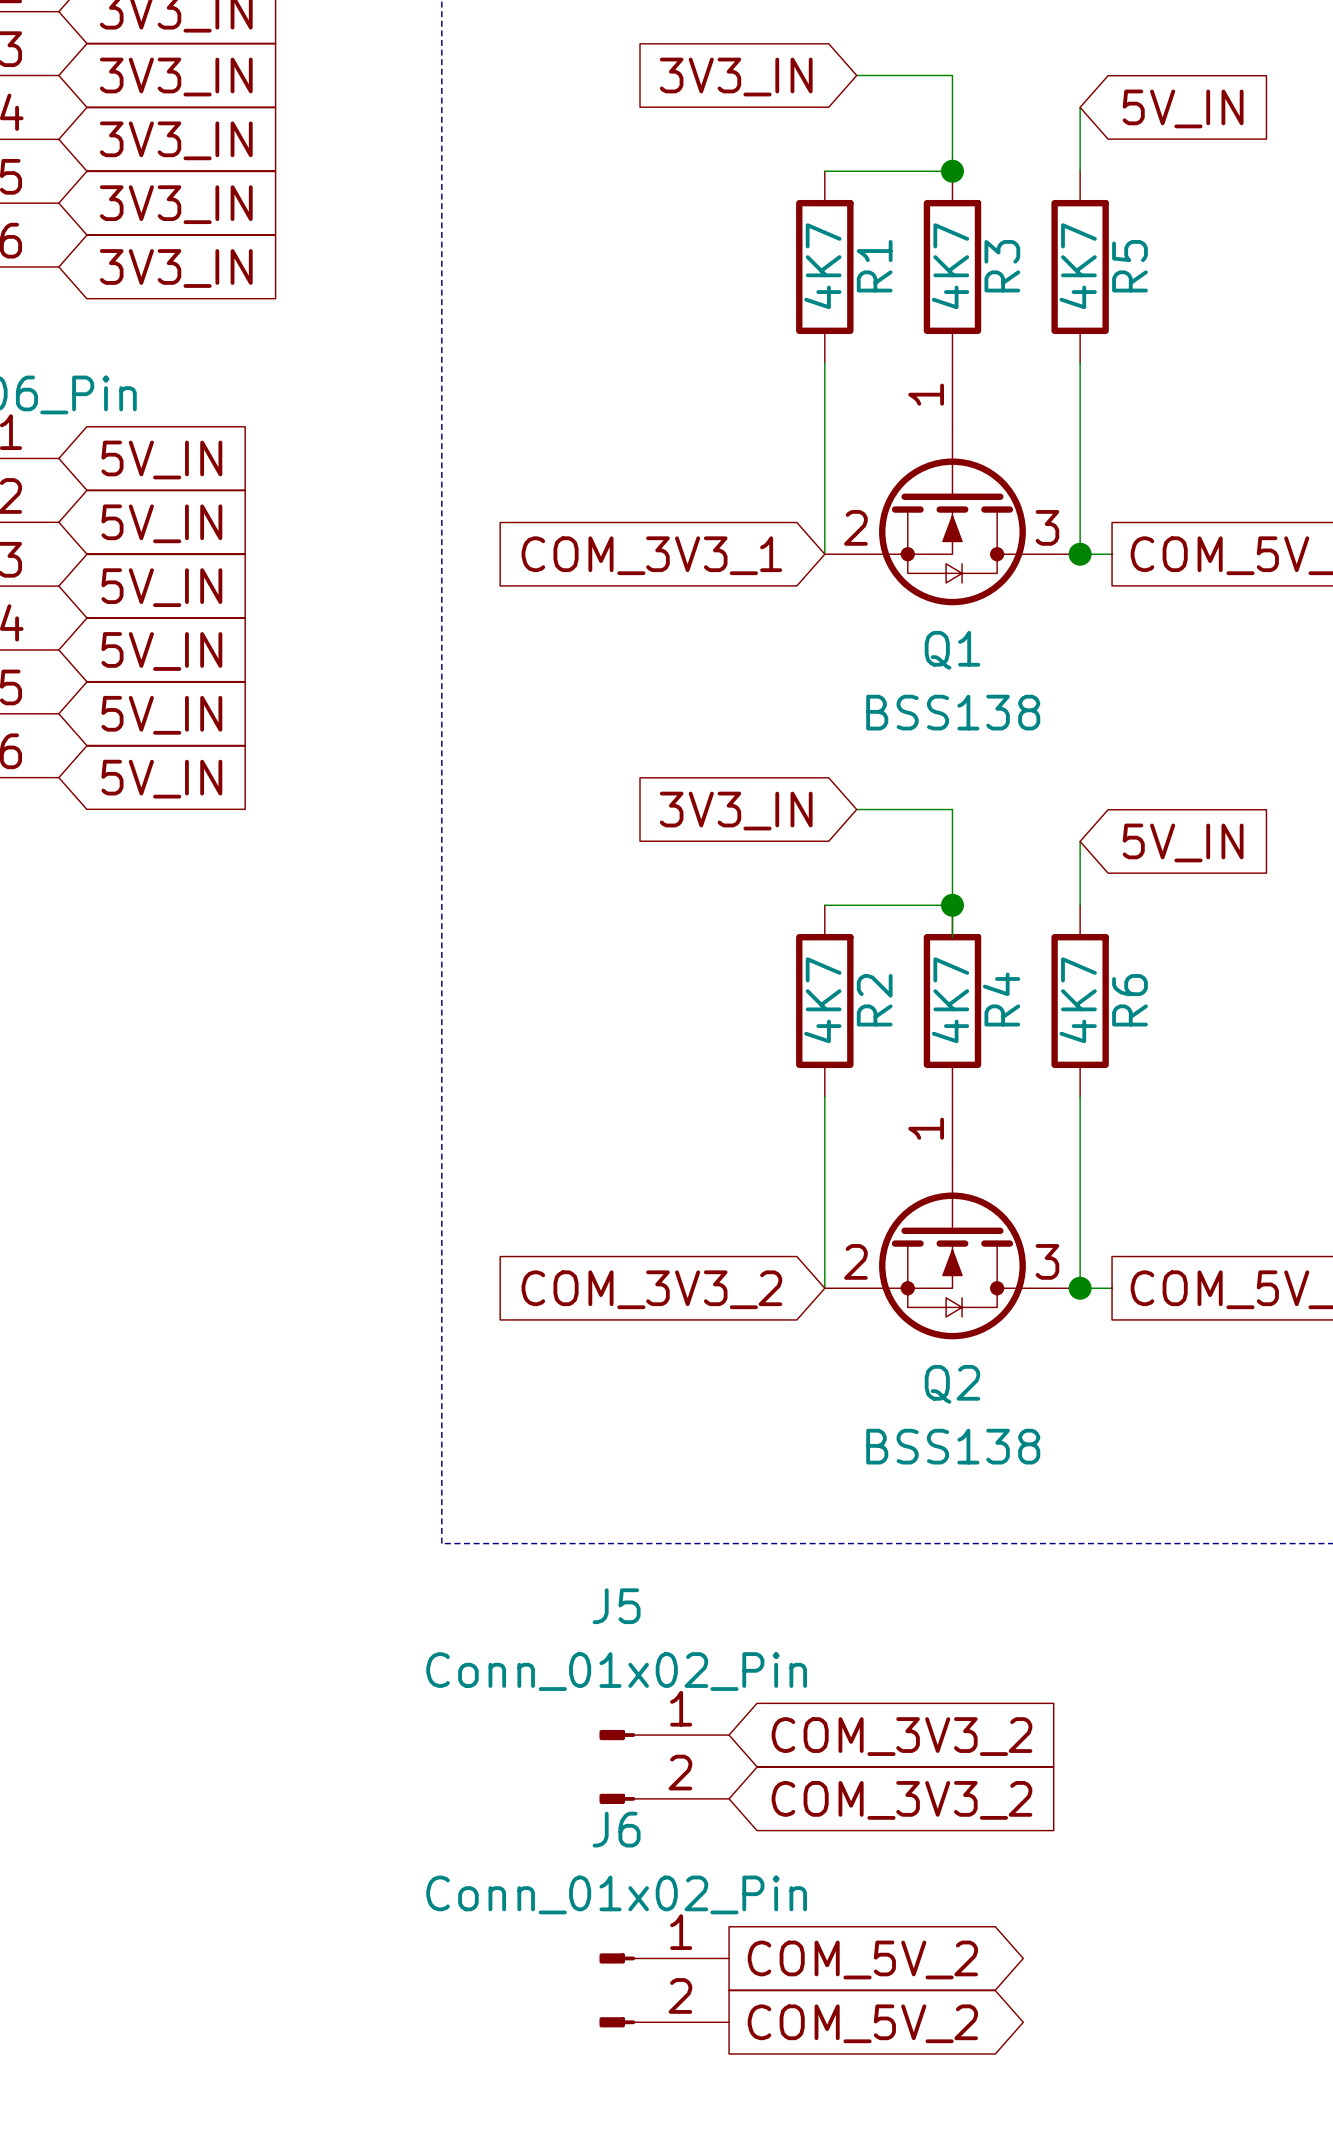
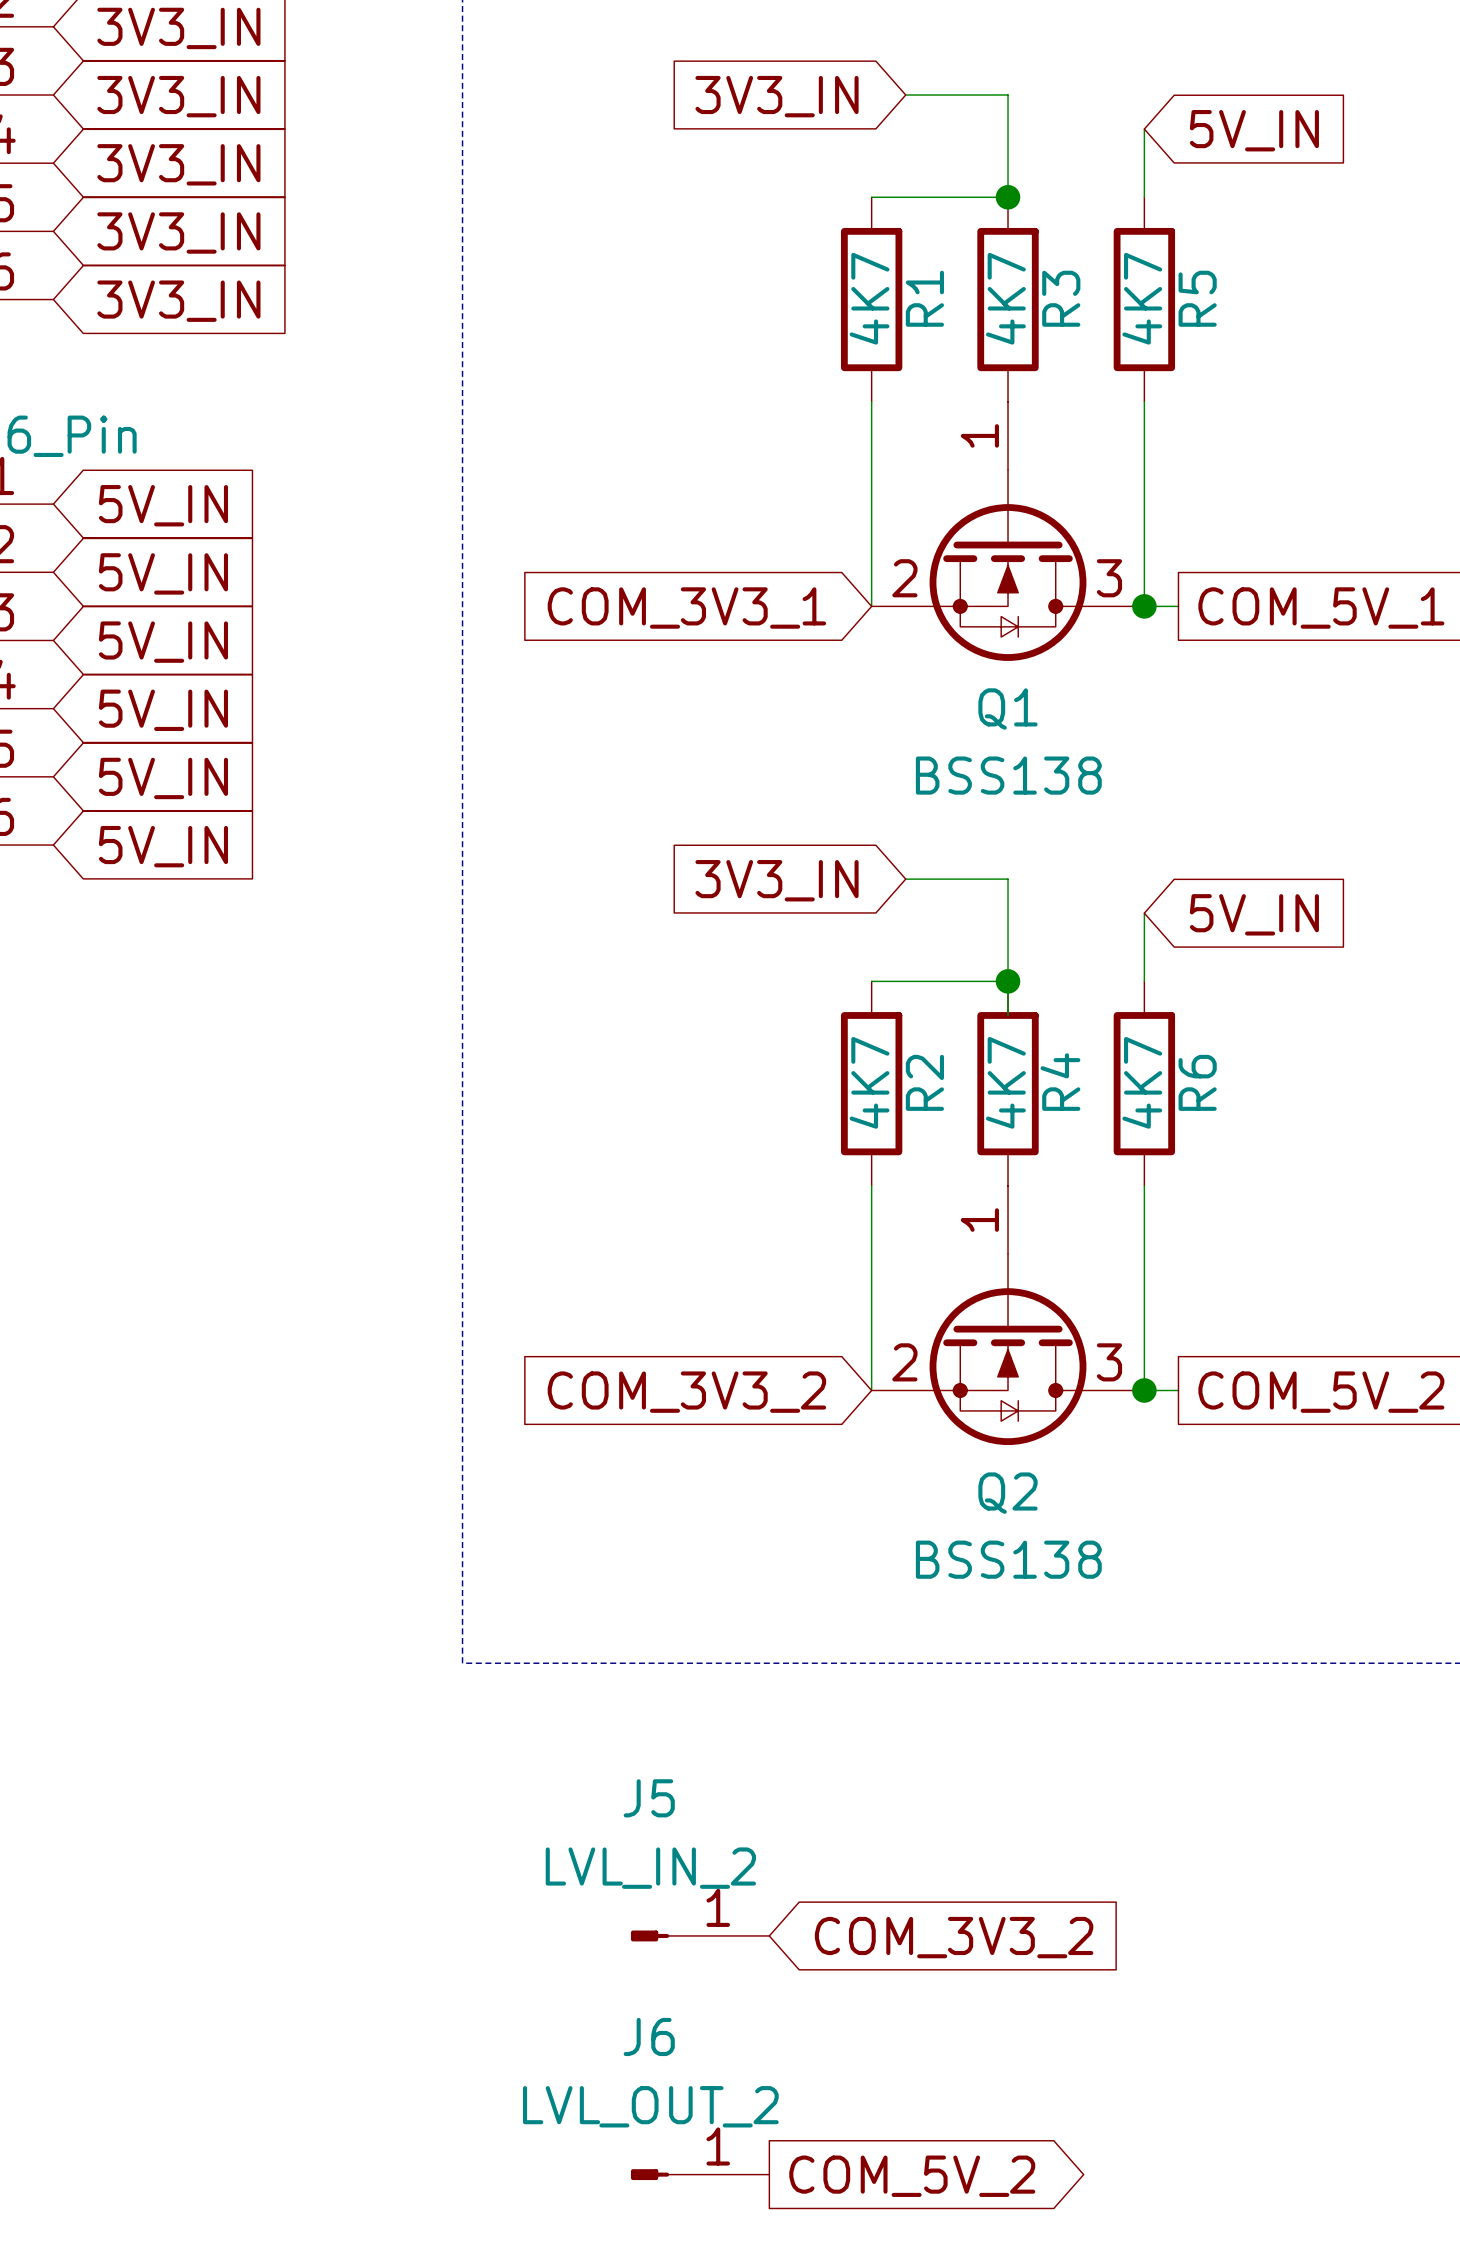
J5 value: Conn_01x02_Pin (616, 1671) -> LVL_IN_2 (650, 1868)
J5 symbol: [599, 1729, 730, 1804] -> [630, 1930, 770, 1942]
global label: COM_3V3_2 (901, 1736) -> none
J6 value: Conn_01x02_Pin (616, 1894) -> LVL_OUT_2 (650, 2106)
J6 symbol: [599, 1953, 730, 2028] -> [630, 2169, 770, 2181]
global label: COM_5V_2 (862, 1959) -> none

